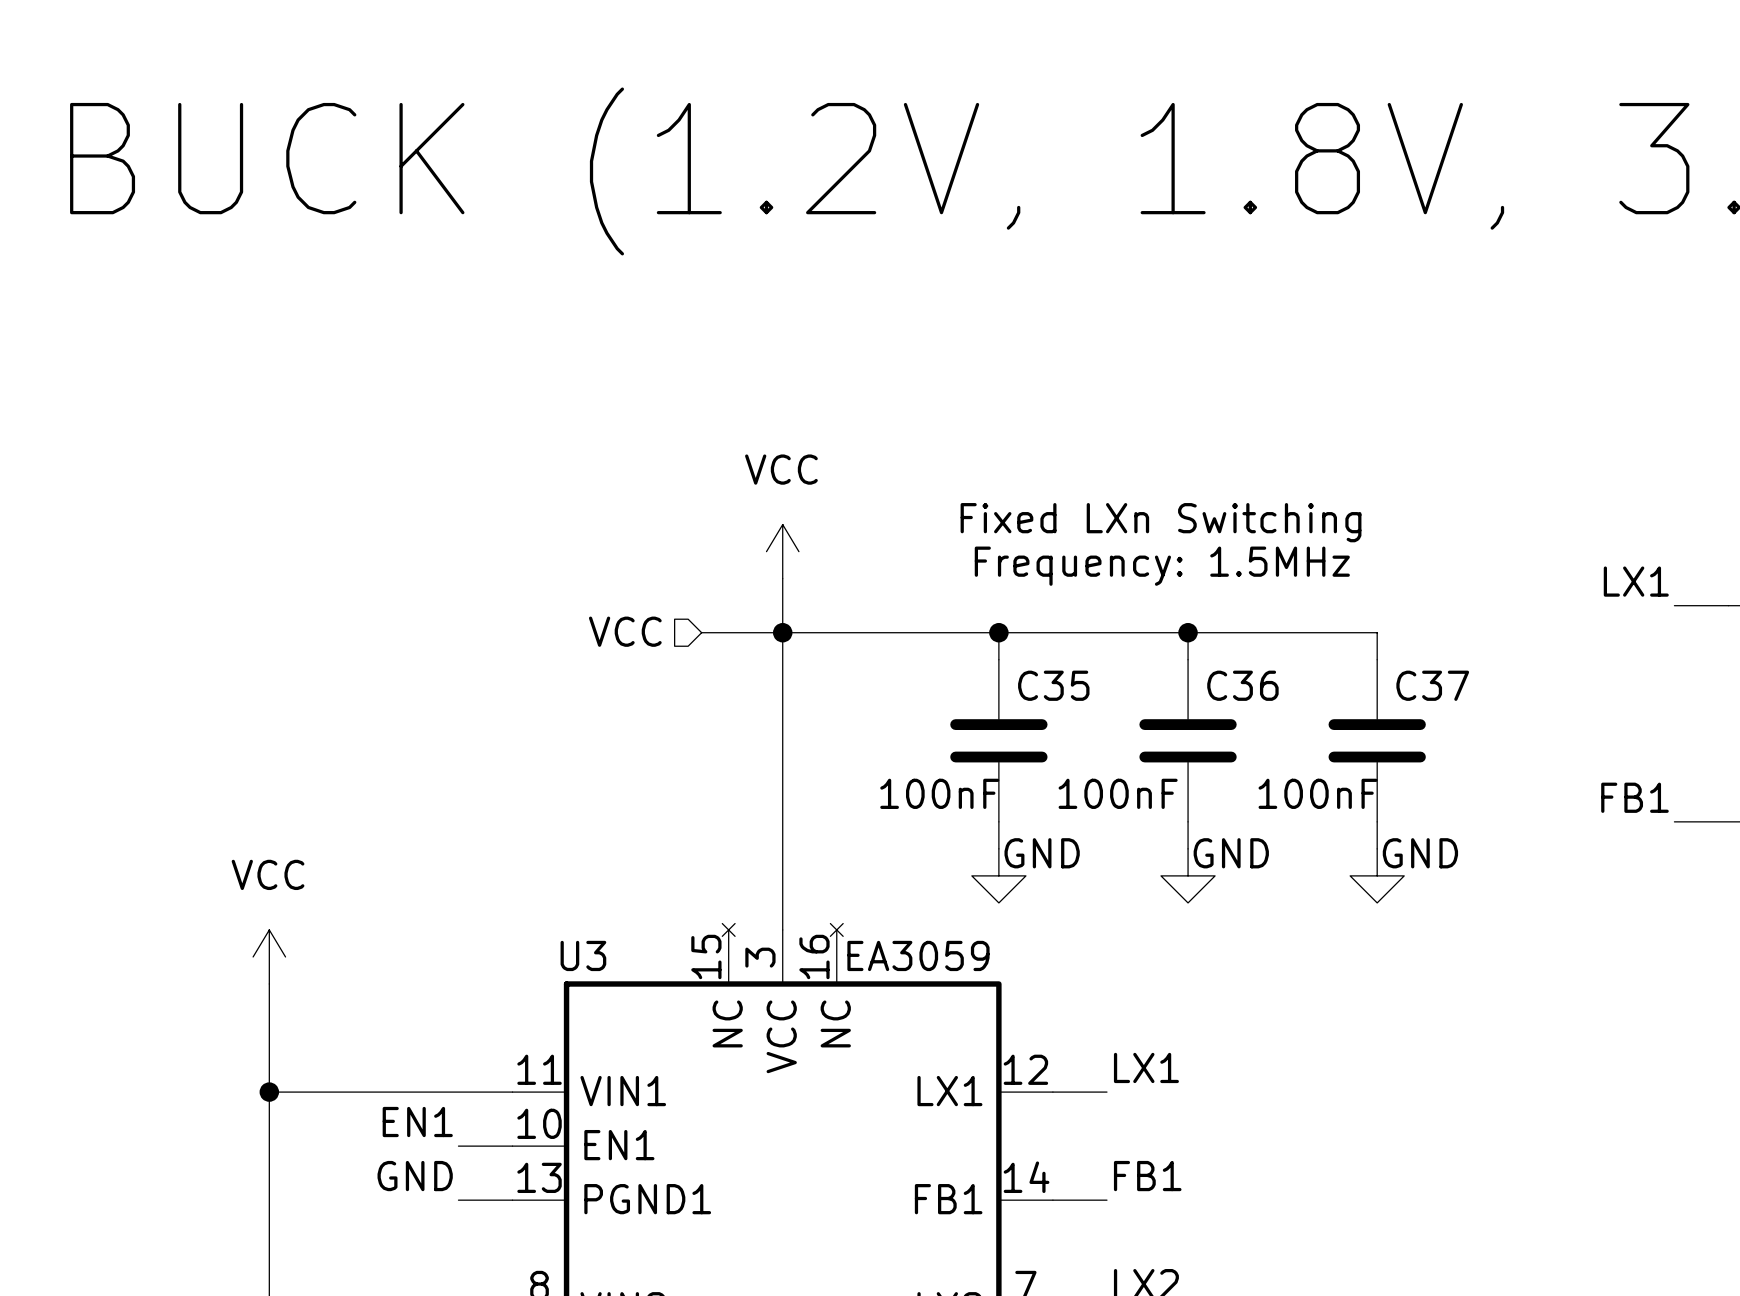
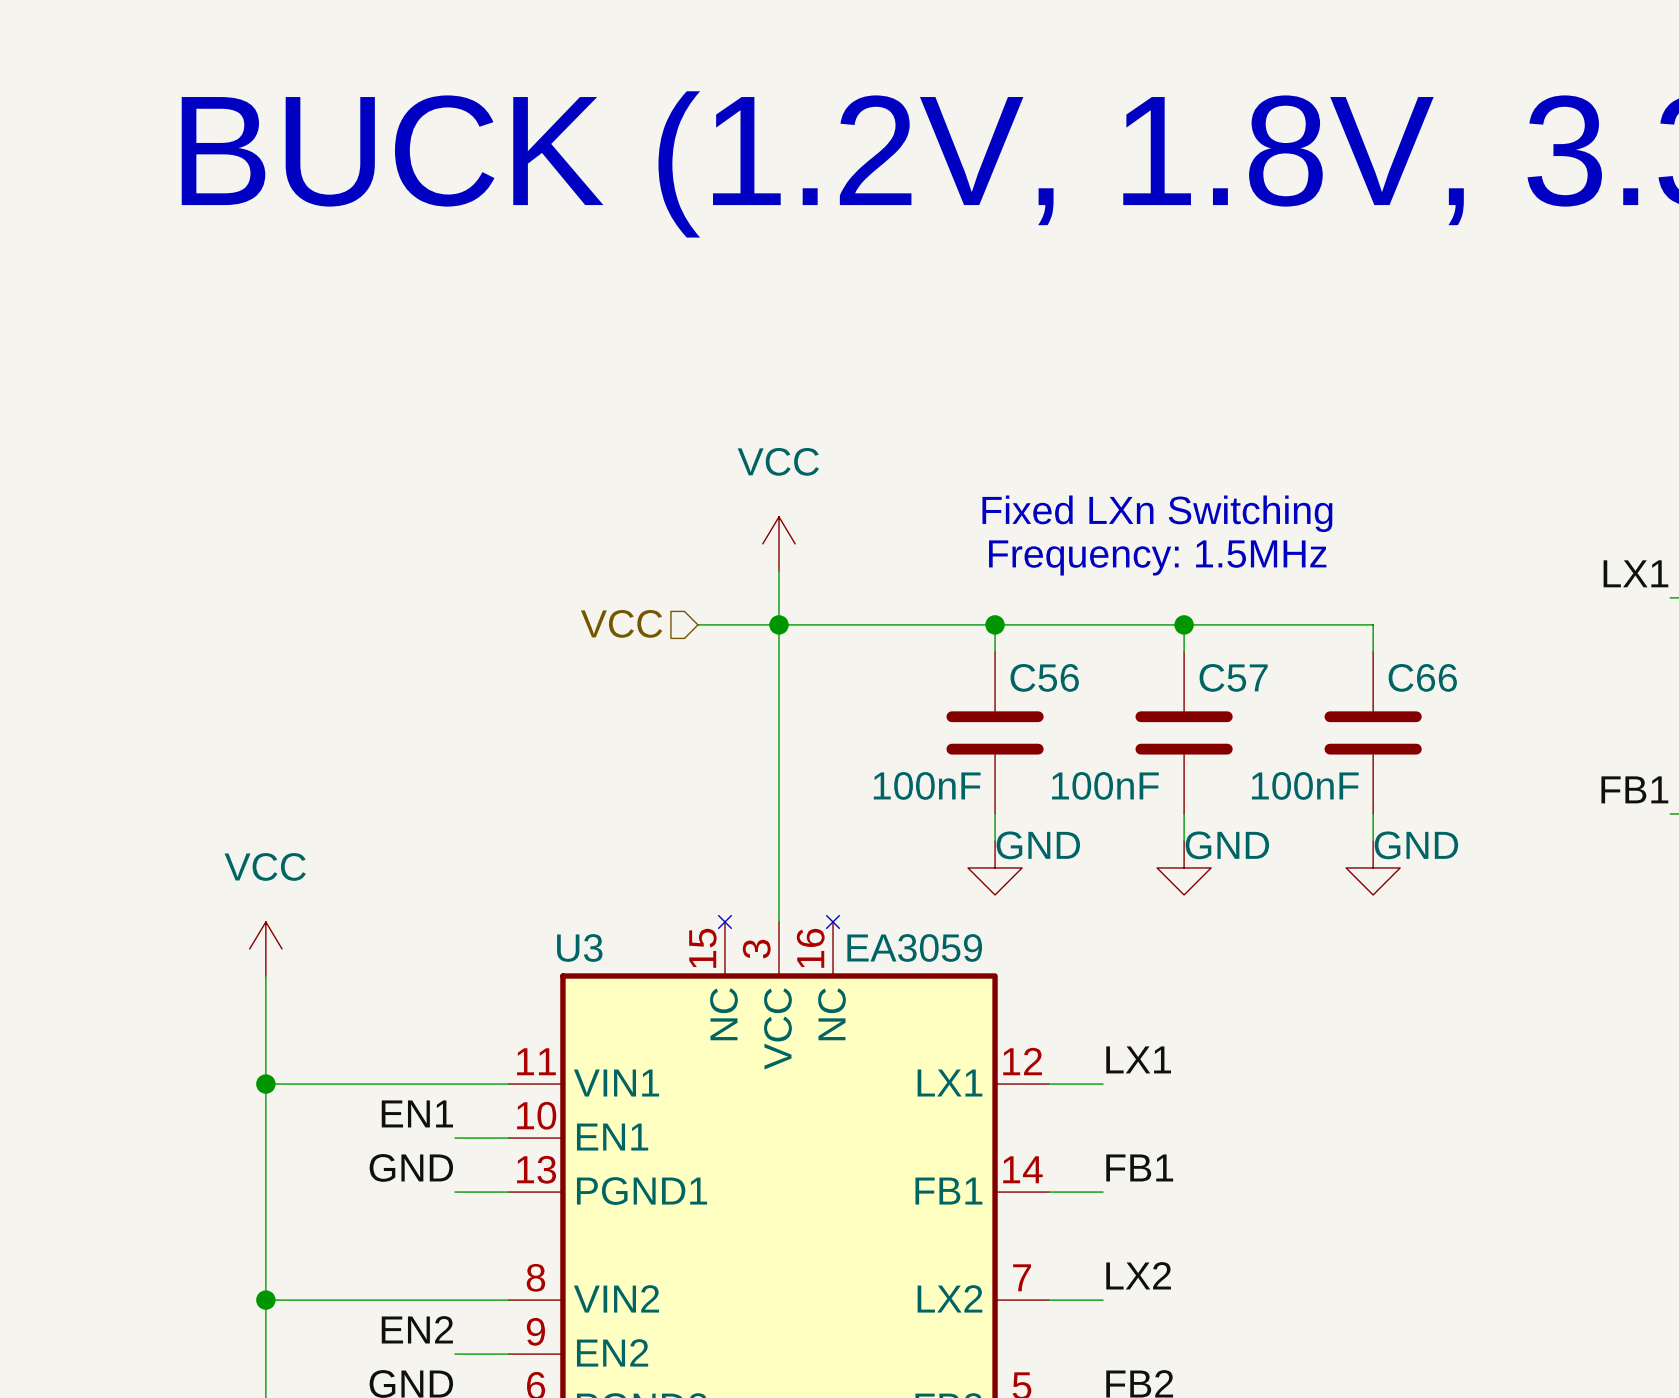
C35 name: C35 (1053, 685) -> C56 (1044, 677)
C36 name: C36 (1242, 685) -> C57 (1233, 677)
C37 name: C37 (1432, 685) -> C66 (1422, 677)

